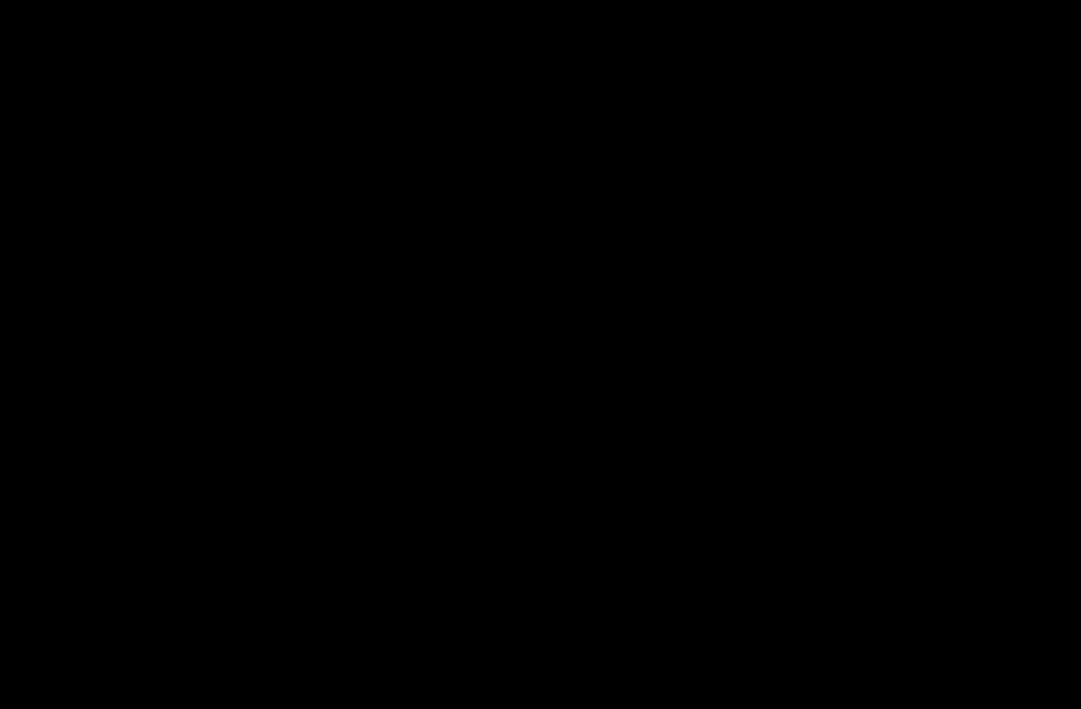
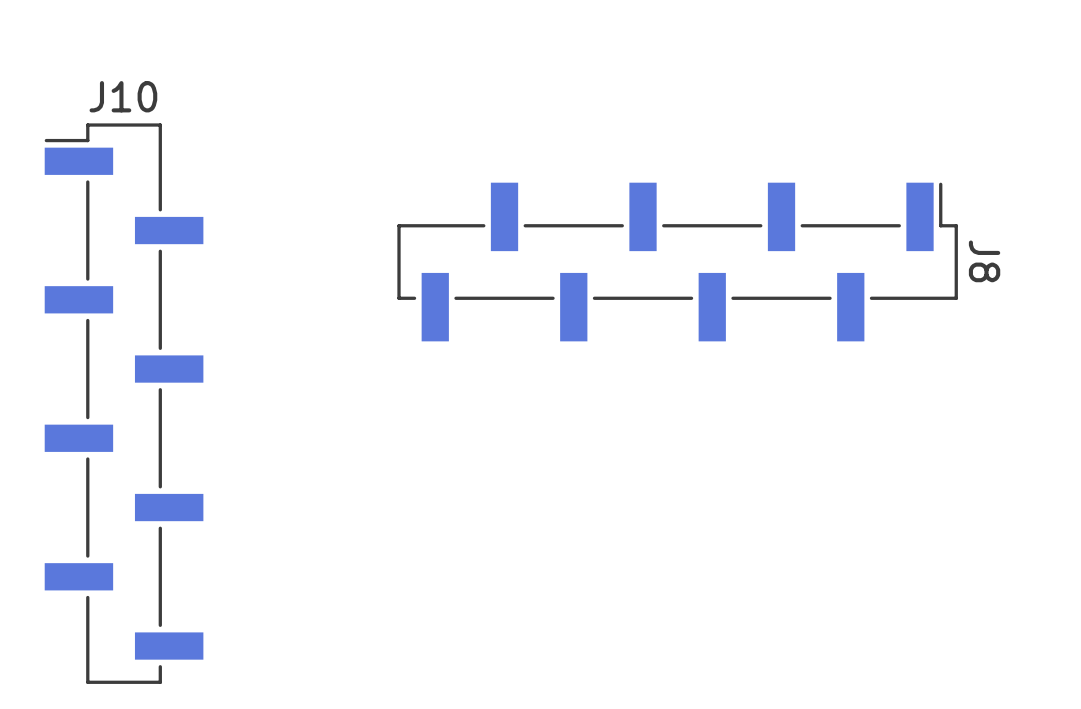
J8: none -> (677, 262)
J10: none -> (124, 403)

